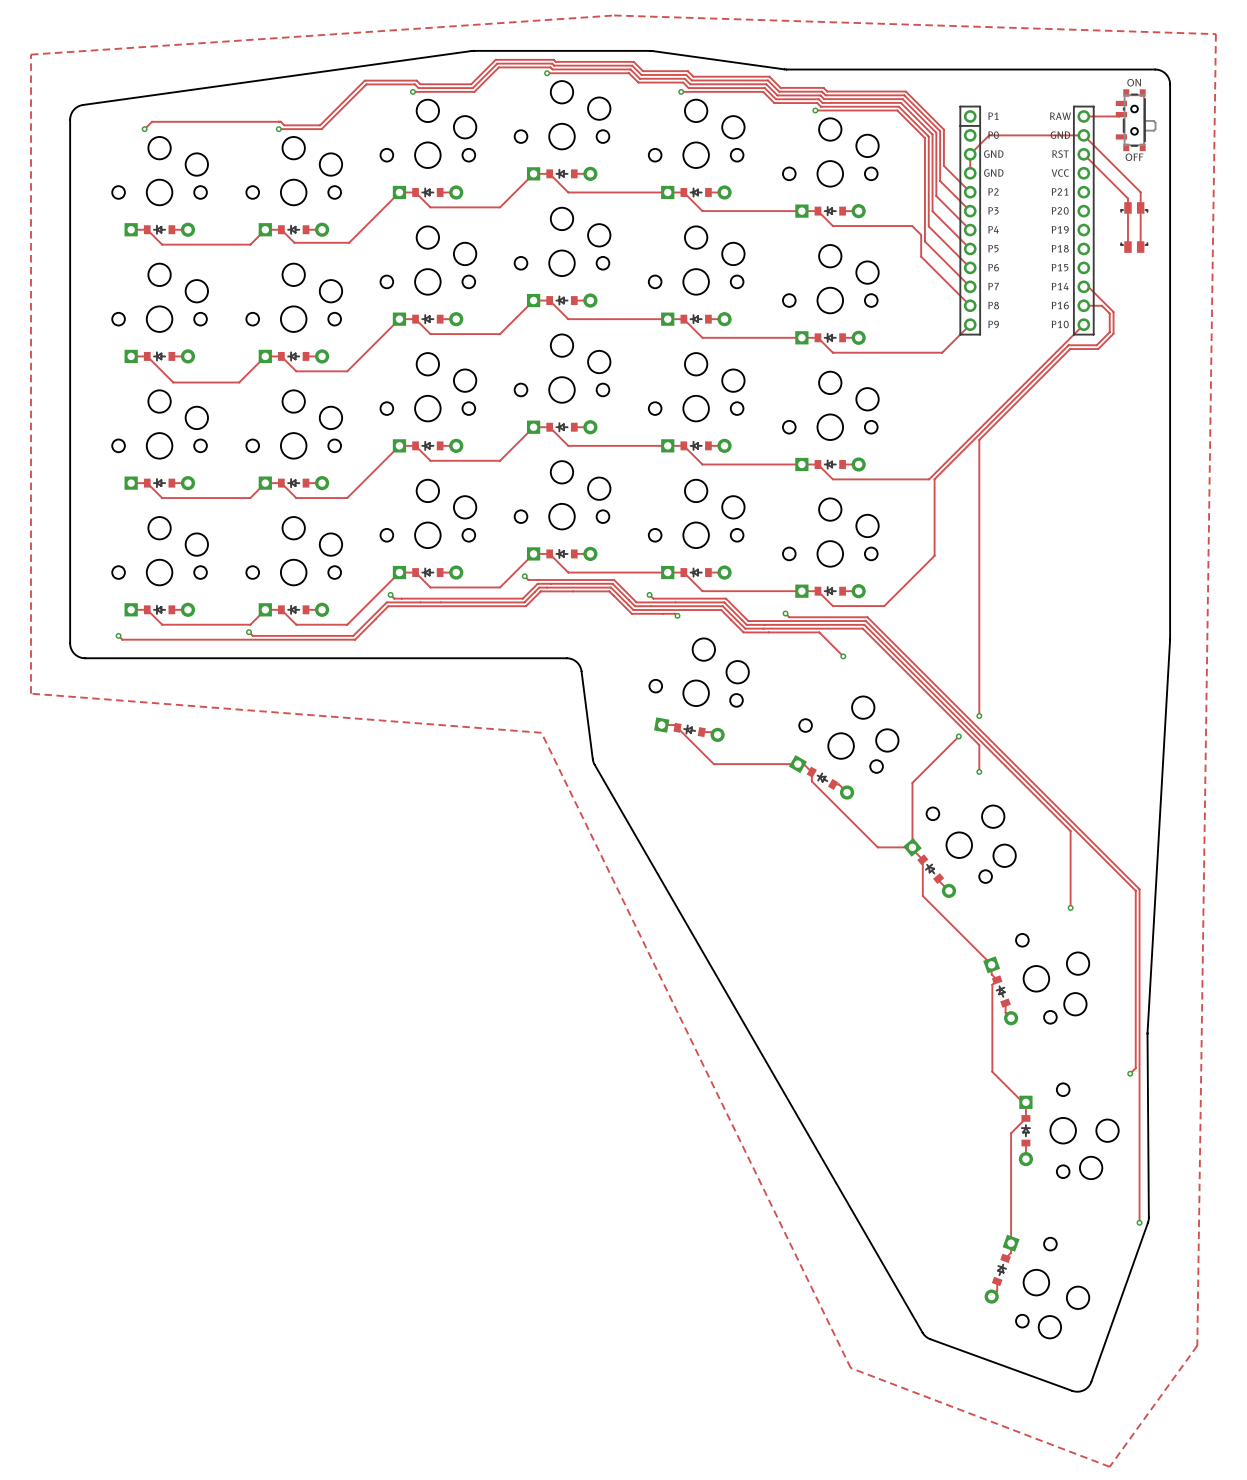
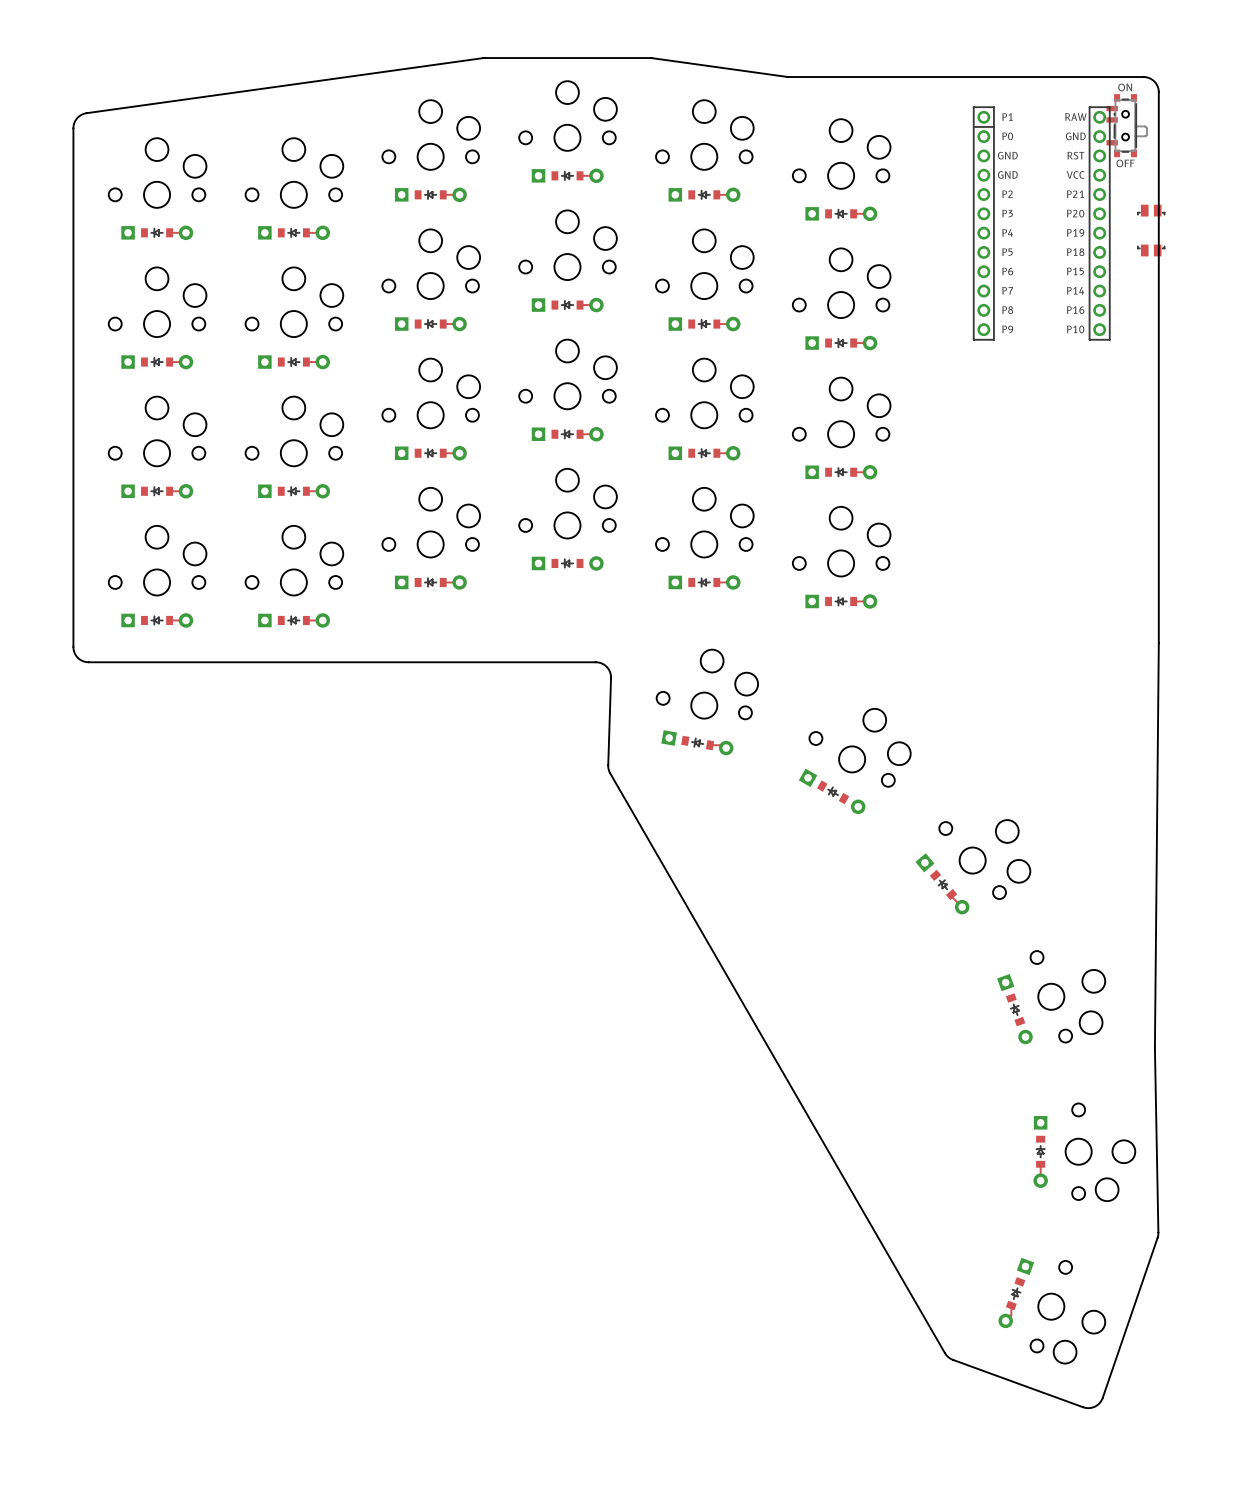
zone outline: (614, 15) (31, 54) (31, 693) (541, 732) (850, 1368) (1109, 1466) (1197, 1345) (1215, 34) (614, 15) -> none
board edge: (473, 50) (651, 50) (786, 69) (1155, 69) (1163, 71) (1168, 77) (1170, 639) (1147, 1033) (1148, 1218) (1091, 1381) (1083, 1390) (1072, 1390) (930, 1339) (923, 1334) (594, 764) (581, 671) (575, 660) (566, 658) (85, 658) (77, 655) (71, 649) (70, 119) (72, 111) (82, 104) (473, 50) -> (484, 58) (86, 113) (76, 119) (73, 128) (74, 653) (80, 659) (88, 662) (595, 662) (605, 665) (611, 676) (609, 772) (945, 1354) (952, 1359) (1083, 1407) (1094, 1406) (1102, 1397) (1158, 1234) (1154, 1048) (1158, 643) (1157, 85) (1151, 79) (1143, 77) (788, 77) (651, 58) (484, 58)
track: (547, 73) (629, 73) (638, 82) (683, 82) (688, 88) (764, 88) (775, 99) (818, 99) (822, 102) (900, 102) (932, 134) (932, 211) (970, 248) -> none
via: (547, 73) -> none
track: (412, 91) (474, 91) (498, 67) (550, 67) (552, 69) (630, 69) (639, 78) (684, 78) (690, 84) (766, 84) (777, 95) (820, 95) (824, 99) (902, 99) (936, 132) (936, 196) (970, 230) -> none
via: (412, 91) -> none
track: (681, 91) (763, 91) (774, 103) (817, 103) (820, 106) (898, 106) (928, 136) (928, 226) (970, 267) -> none
via: (681, 91) -> none
track: (815, 110) (897, 110) (924, 138) (924, 241) (970, 286) -> none
via: (815, 110) -> none
track: (1121, 114) (1119, 116) (1083, 116) -> none
part position: (1135, 120) -> (1126, 125)
track: (144, 129) (152, 121) (280, 121) (284, 125) (320, 125) (364, 80) (416, 80) (420, 84) (471, 84) (495, 59) (633, 61) (643, 71) (687, 71) (693, 76) (769, 76) (780, 87) (823, 87) (827, 91) (905, 91) (943, 129) (943, 165) (970, 192) -> none
via: (144, 129) -> none
track: (278, 129) (321, 129) (366, 84) (414, 84) (418, 88) (472, 88) (497, 63) (632, 65) (641, 74) (686, 74) (691, 80) (767, 80) (779, 91) (822, 91) (825, 95) (904, 95) (940, 131) (940, 181) (970, 211) -> none
via: (278, 129) -> none
track: (1083, 154) (1127, 198) (1127, 247) -> none
track: (970, 173) (970, 154) (989, 135) (1083, 135) (1140, 192) (1140, 247) -> none
track: (131, 229) (147, 229) (162, 244) (250, 244) (265, 229) (281, 229) (294, 242) (349, 242) (399, 192) (415, 192) (430, 207) (500, 207) (533, 173) (549, 173) (568, 192) (683, 192) (702, 211) (817, 211) (832, 226) (912, 226) (921, 234) (921, 256) (970, 305) -> none
track: (1083, 286) (1088, 286) (1113, 312) (1113, 333) (1098, 349) (1070, 349) (979, 439) (979, 716) -> none
track: (1083, 305) (1101, 305) (1109, 313) (1109, 332) (1096, 345) (1068, 345) (934, 479) (934, 555) (884, 606) (832, 606) (817, 591) (702, 591) (683, 572) (568, 572) (549, 553) (533, 553) (500, 587) (430, 587) (415, 572) (399, 572) (347, 624) (296, 624) (281, 609) (265, 609) (250, 624) (162, 624) (147, 609) (131, 609) -> none
track: (970, 324) (942, 352) (832, 352) (817, 337) (702, 337) (683, 319) (568, 319) (549, 300) (533, 300) (500, 334) (430, 334) (415, 319) (399, 319) (347, 371) (296, 371) (281, 356) (265, 356) (239, 382) (173, 382) (147, 356) (131, 356) -> none
track: (1083, 324) (929, 479) (832, 479) (817, 464) (702, 464) (683, 445) (568, 445) (549, 427) (533, 427) (500, 460) (430, 460) (415, 445) (399, 445) (347, 498) (296, 498) (281, 483) (265, 483) (250, 498) (162, 498) (147, 483) (131, 483) -> none
track: (574, 553) (590, 553) -> none
track: (524, 576) (528, 580) (614, 580) (636, 602) (724, 602) (746, 624) (864, 624) (1070, 831) (1070, 907) -> none
via: (524, 576) -> none
track: (390, 594) (394, 598) (522, 598) (537, 583) (612, 583) (635, 606) (722, 606) (745, 628) (862, 628) (979, 745) (979, 771) -> none
via: (390, 594) -> none
track: (649, 594) (653, 598) (725, 598) (748, 621) (865, 621) (1135, 890) (1135, 1068) (1130, 1073) -> none
via: (649, 594) -> none
track: (785, 613) (789, 617) (867, 617) (1139, 889) (1139, 1222) -> none
via: (785, 613) -> none
track: (677, 615) (675, 613) (631, 613) (609, 591) (540, 591) (526, 606) (388, 606) (355, 639) (122, 639) (118, 635) -> none
via: (677, 615) -> none
track: (248, 632) (252, 635) (353, 635) (386, 602) (524, 602) (539, 587) (611, 587) (633, 610) (721, 610) (743, 632) (819, 632) (843, 656) -> none
via: (248, 632) -> none
via: (118, 635) -> none
via: (843, 656) -> none
via: (979, 716) -> none
track: (661, 725) (674, 725) (713, 764) (803, 764) (811, 772) (811, 781) (877, 847) (912, 847) -> none
track: (958, 736) (912, 782) (912, 849) (922, 859) (922, 896) (991, 964) (991, 974) (997, 979) (992, 984) (992, 1071) (1022, 1102) (1025, 1102) (1025, 1118) (1011, 1133) (1011, 1252) (1005, 1258) -> none
via: (958, 736) -> none
via: (979, 771) -> none
track: (833, 784) (839, 784) (847, 792) -> none
via: (1070, 907) -> none
track: (1005, 1003) (1005, 1012) (1011, 1018) -> none
via: (1130, 1073) -> none
via: (1139, 1222) -> none

